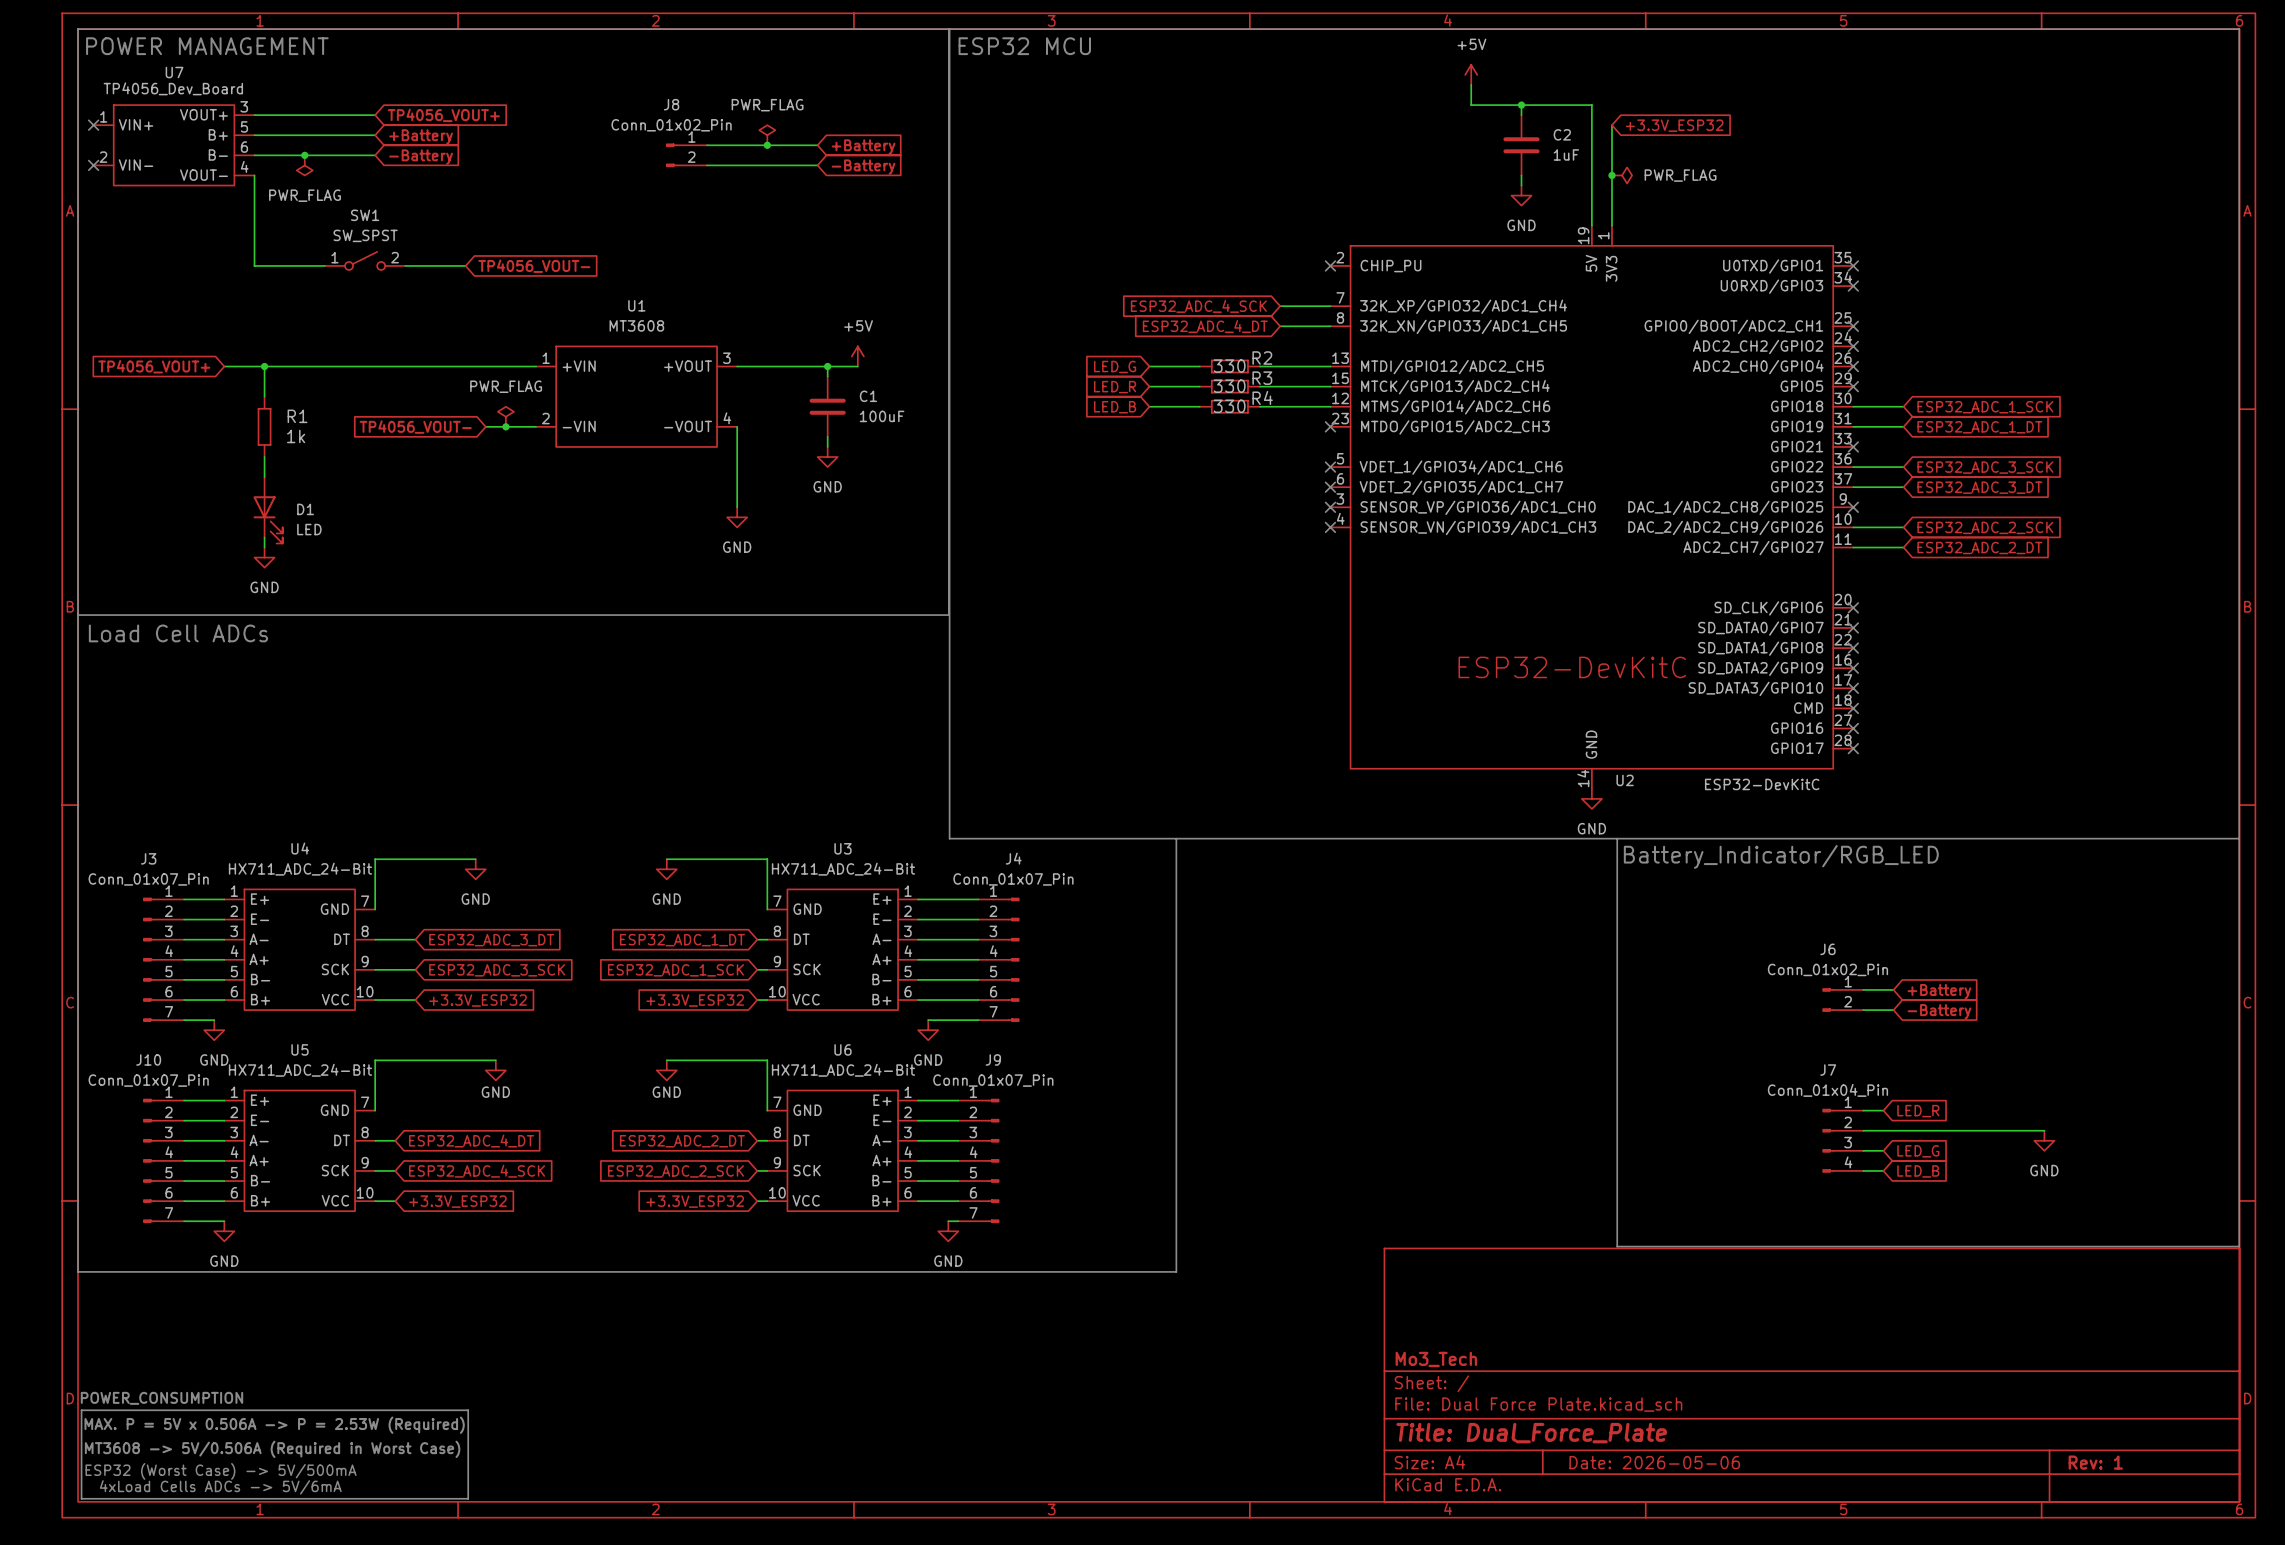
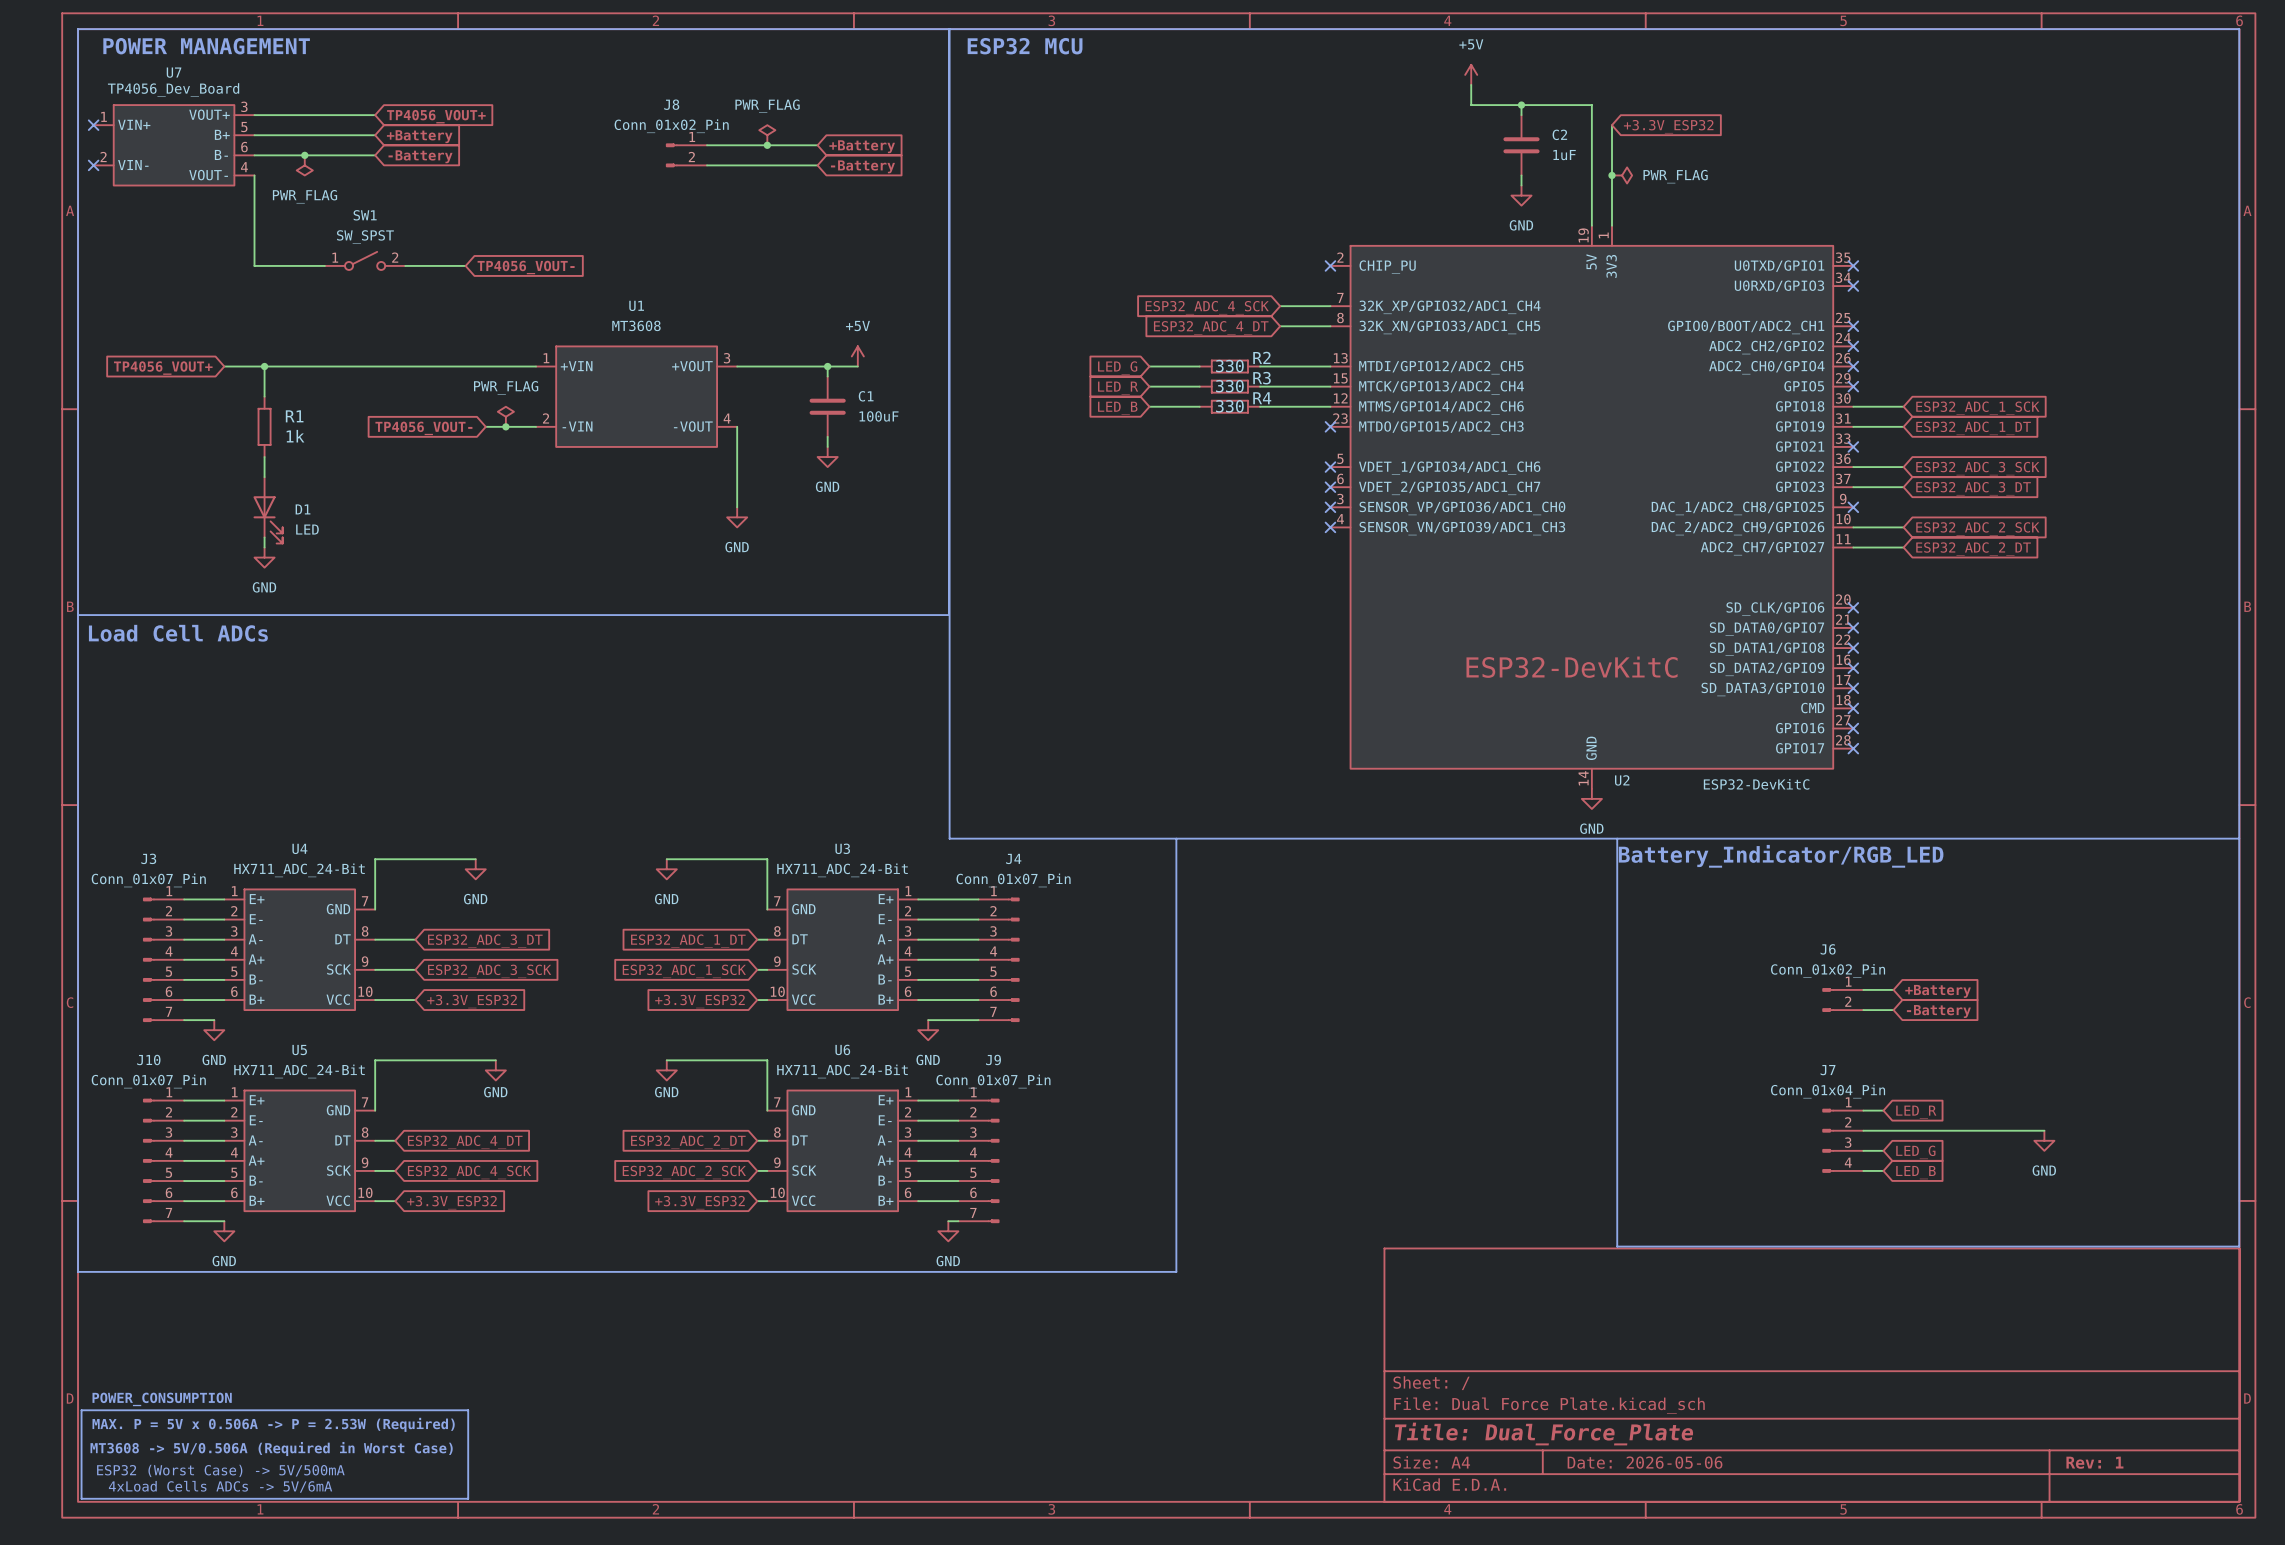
title block: Mo3_Tech (1436, 1359) -> none

